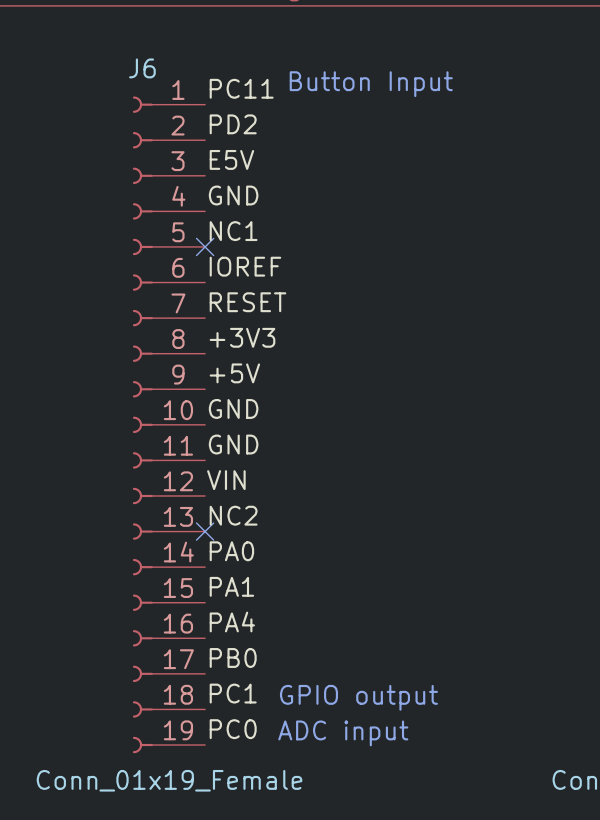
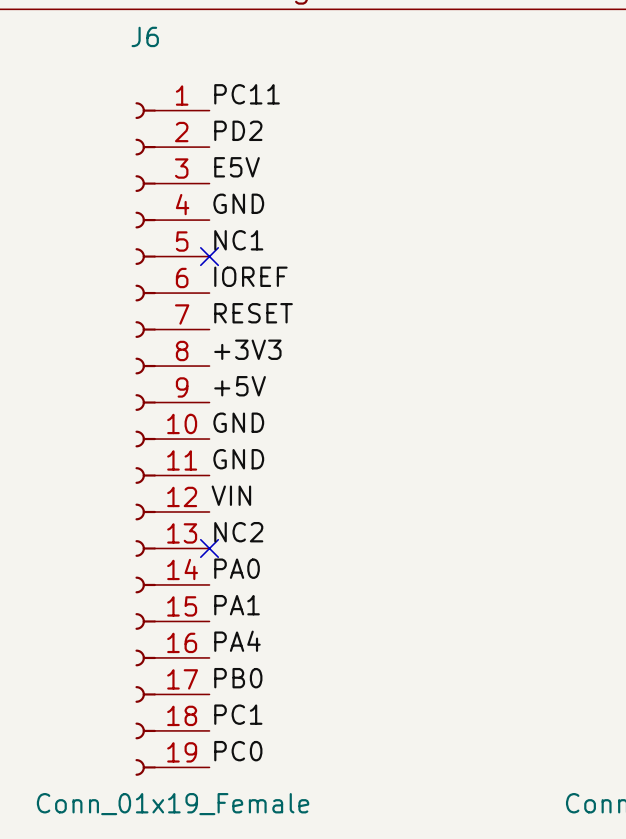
J6 name position: J6 (142, 68) -> J6 (145, 36)
text: Button Input (371, 84) -> none
text: GPIO output (358, 697) -> none
text: ADC input (343, 733) -> none

